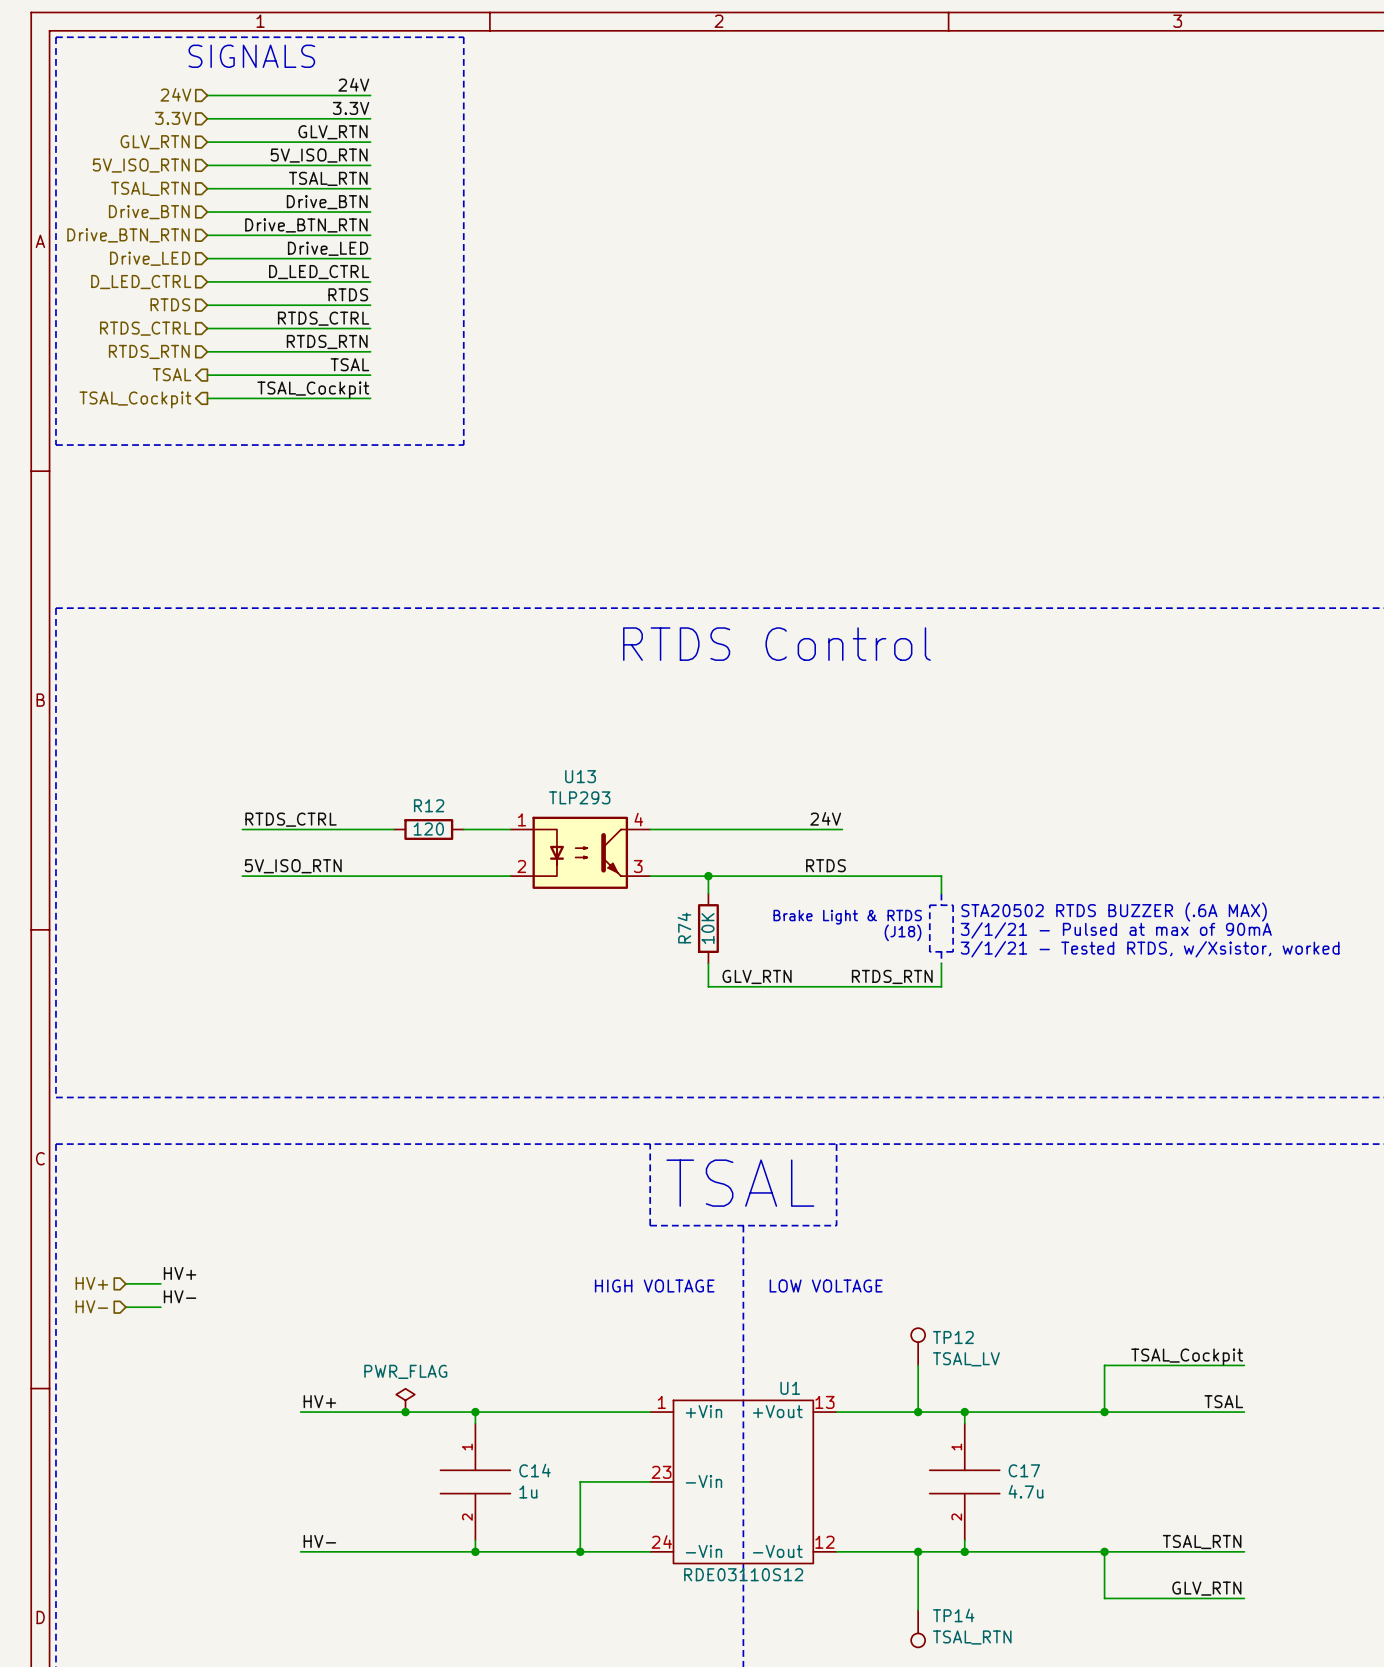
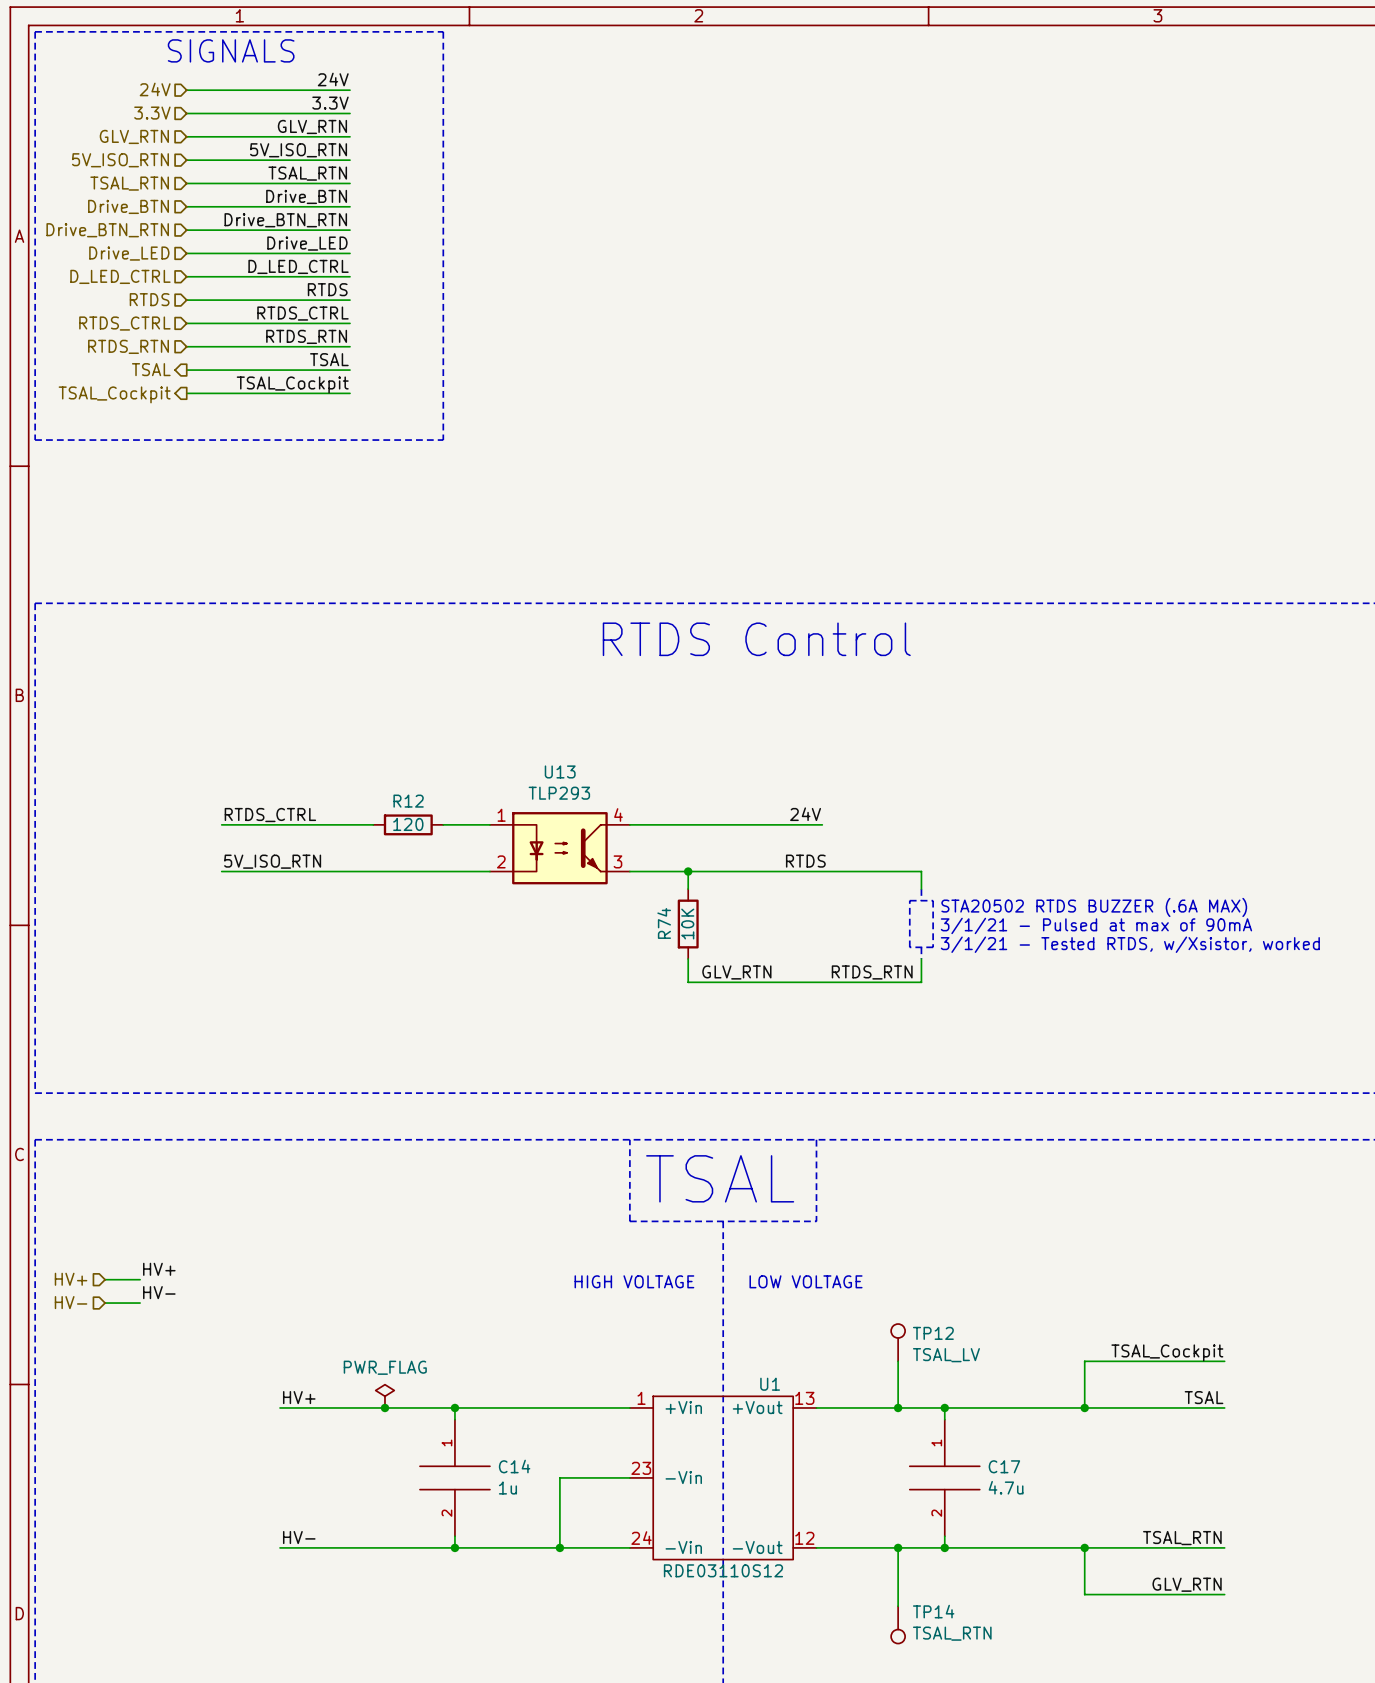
text: Brake Light & RTDS (847, 917) -> none
text: (J18) (903, 932) -> none

